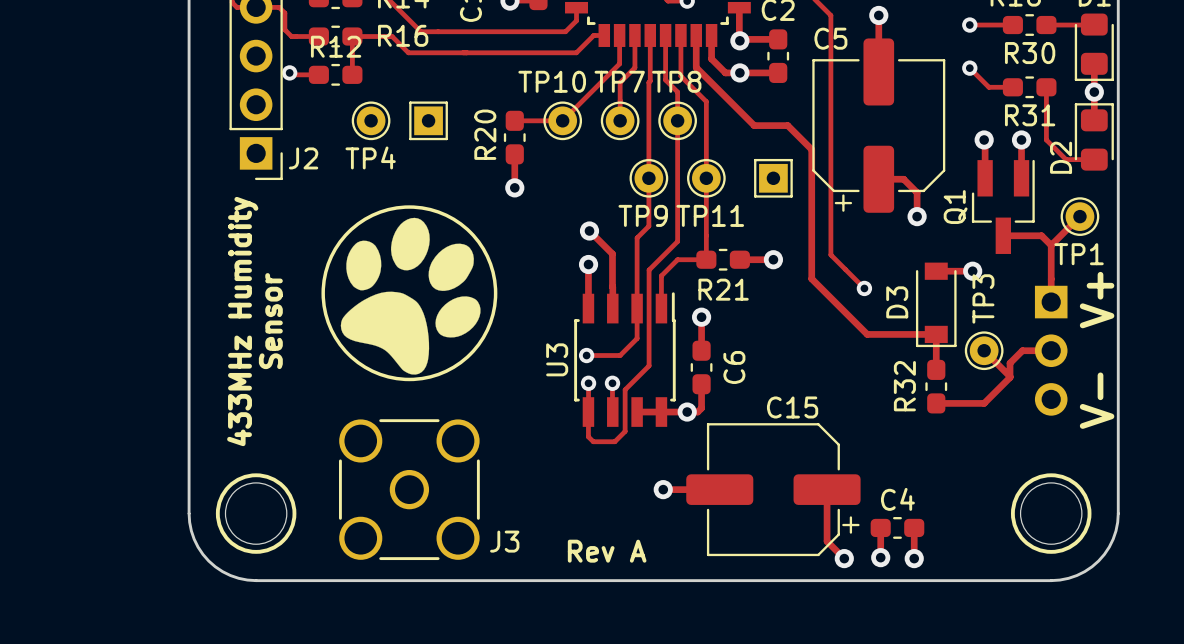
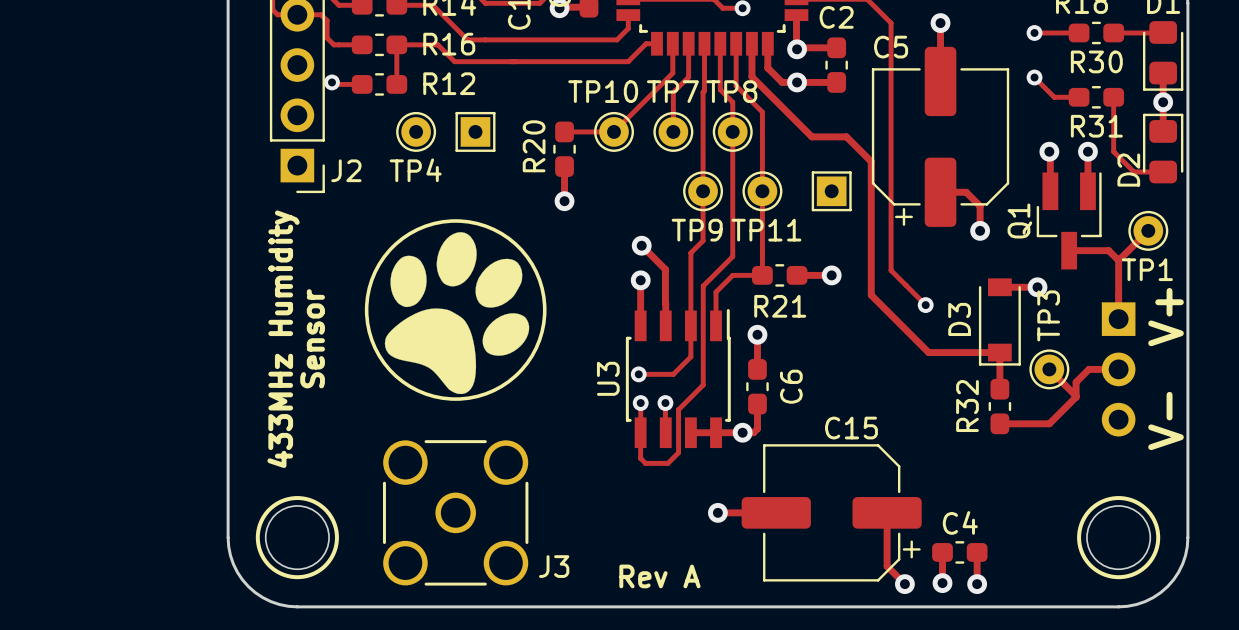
R12 name position: R12 (336, 46) -> R12 (449, 83)

